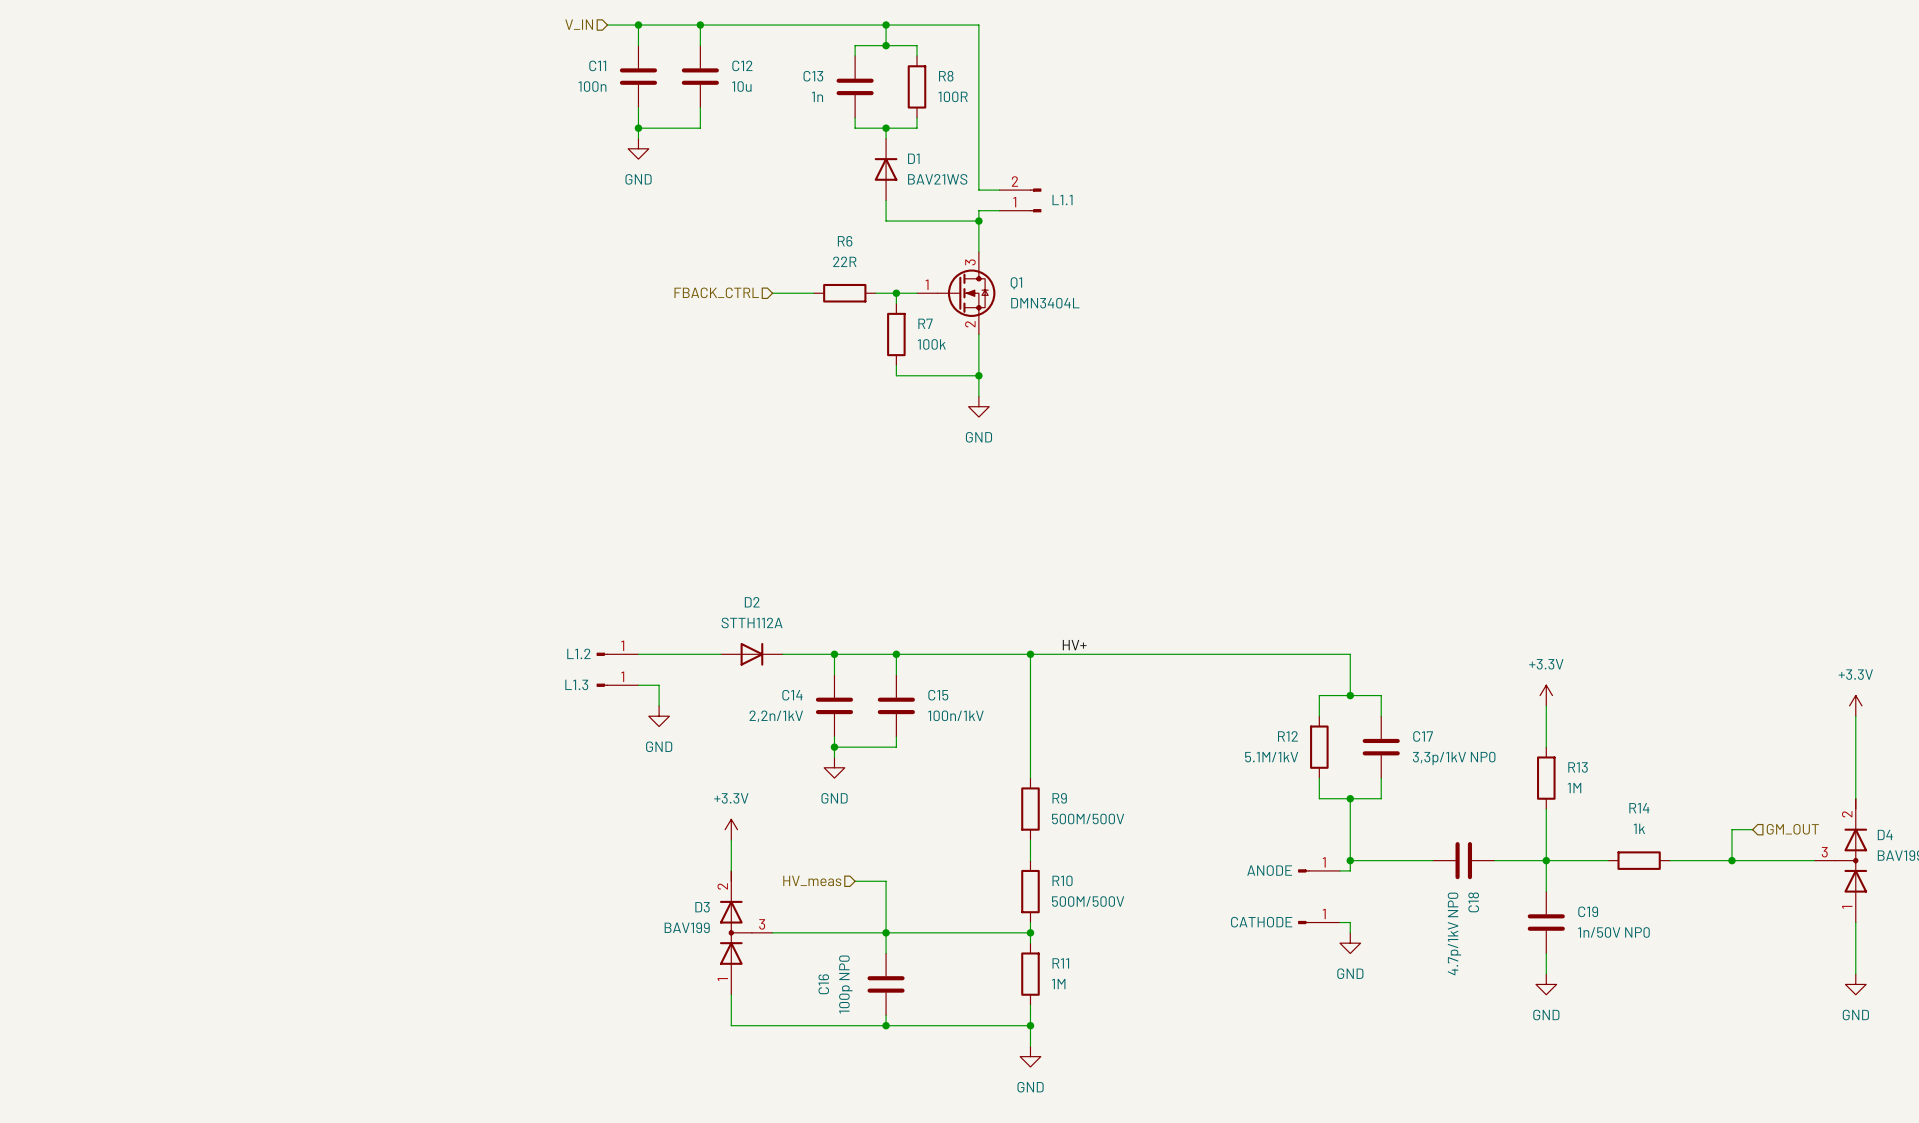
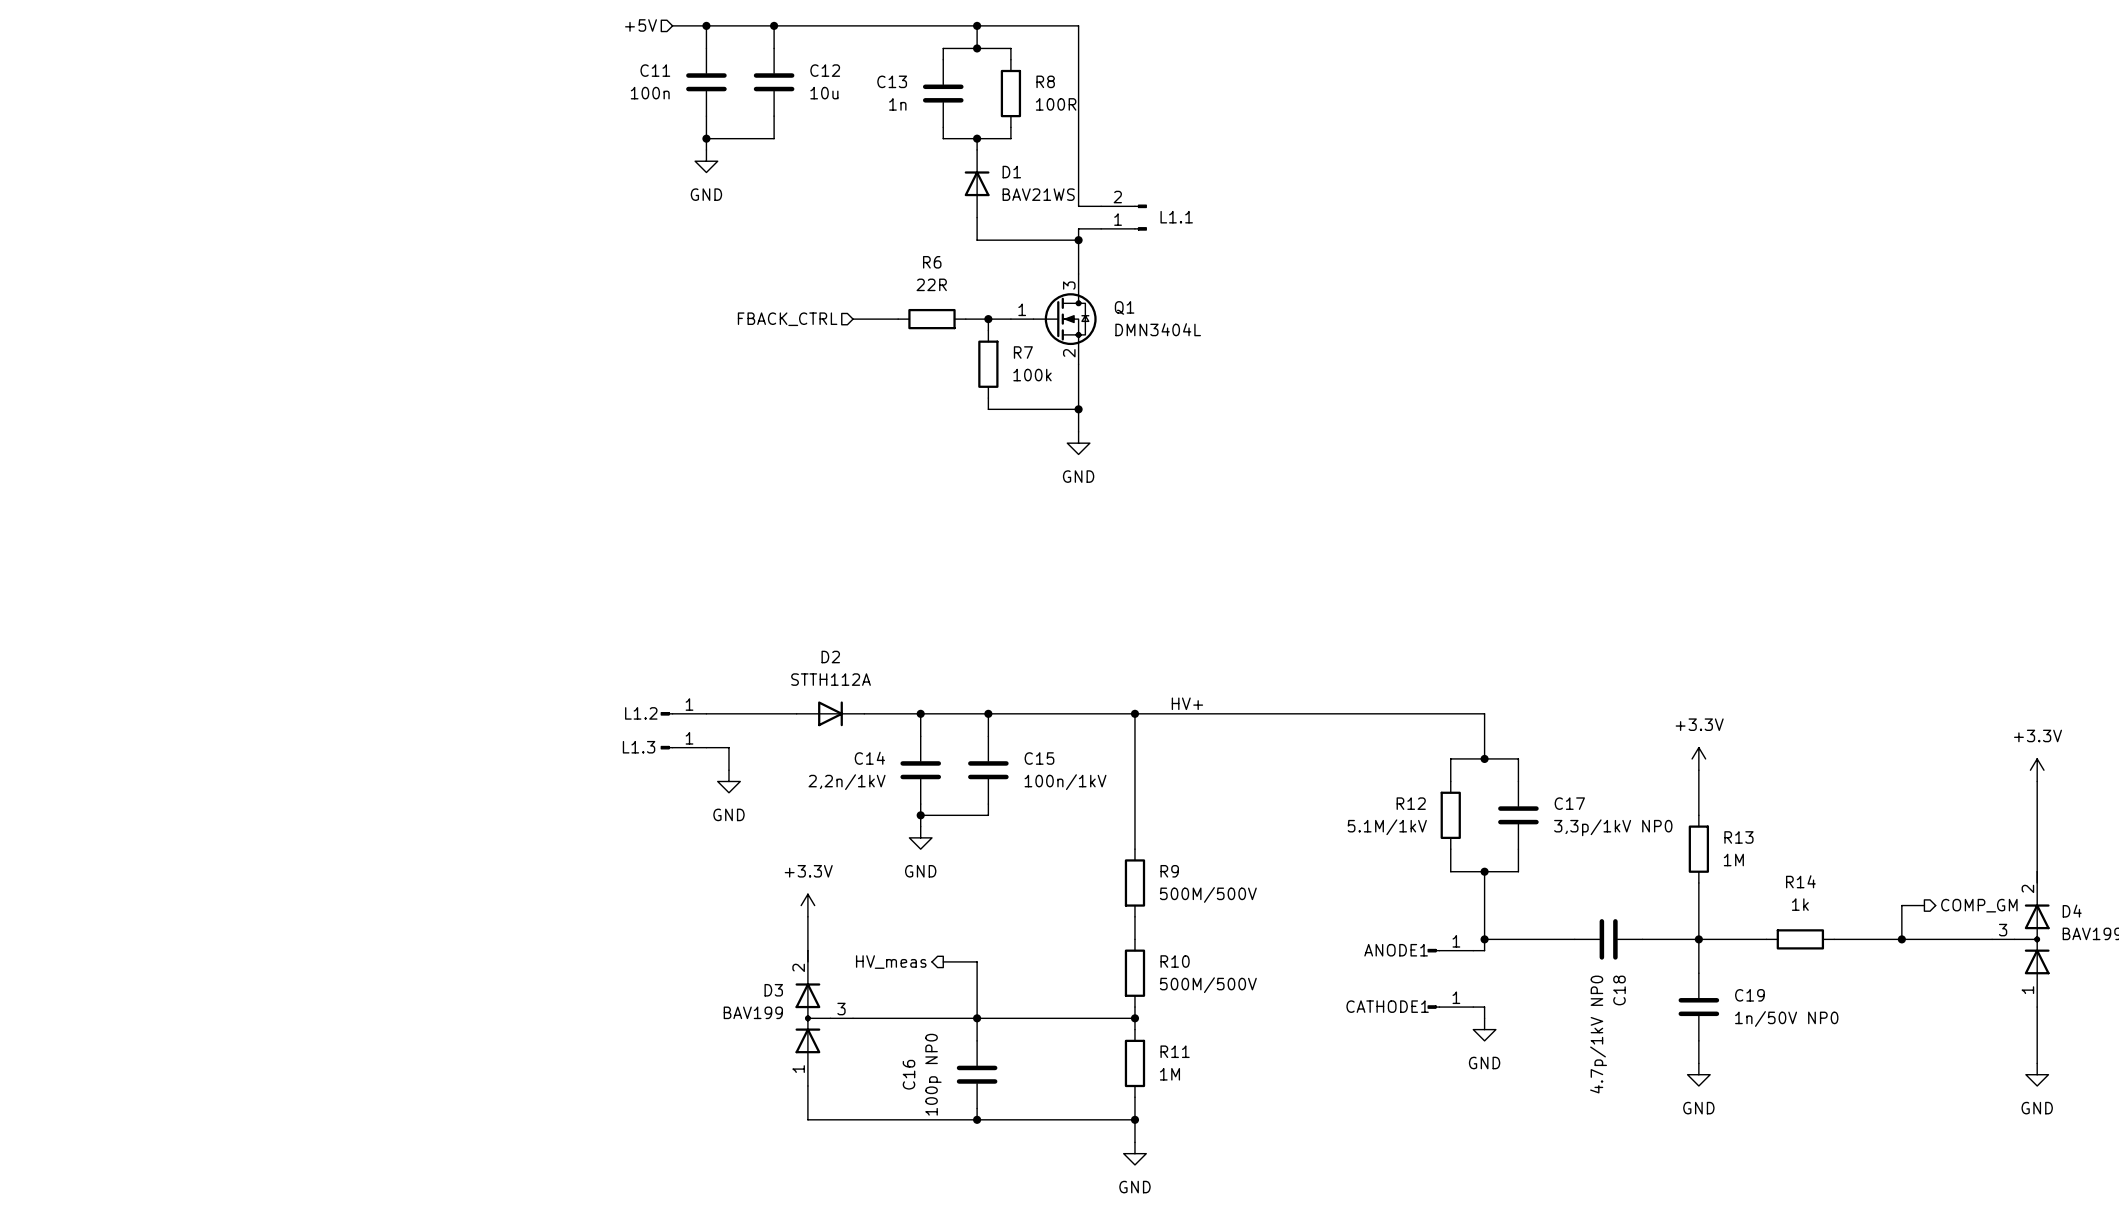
hierarchical label: V_IN (579, 24) -> +5V (641, 25)
hierarchical label shape: input (1792, 829) -> output (1979, 905)
hierarchical label: GM_OUT (1792, 829) -> COMP_GM (1979, 905)
ANODE name: ANODE (1269, 870) -> ANODE1 (1396, 950)
hierarchical label shape: input (812, 880) -> output (891, 962)
CATHODE name: CATHODE (1261, 922) -> CATHODE1 (1387, 1006)

